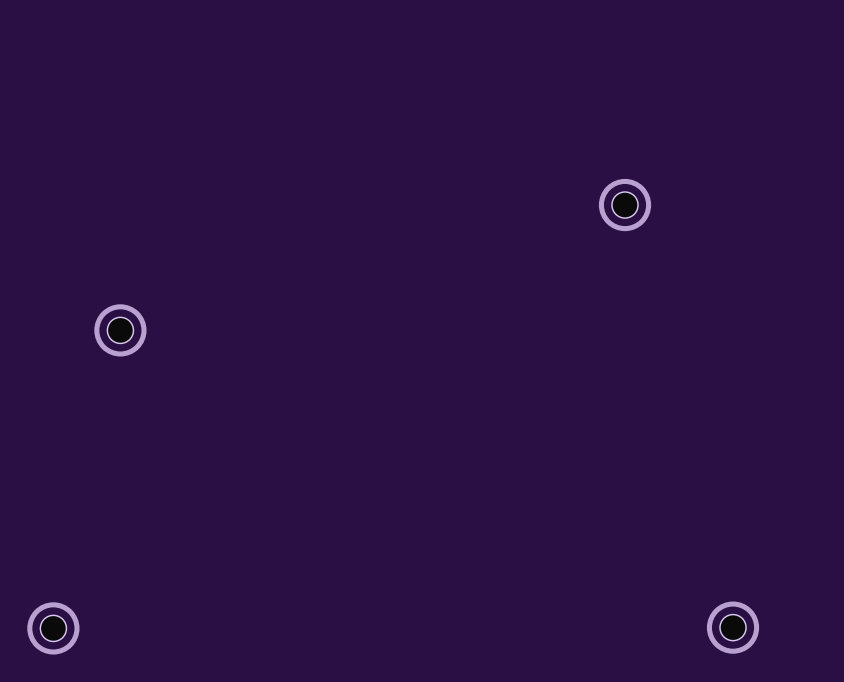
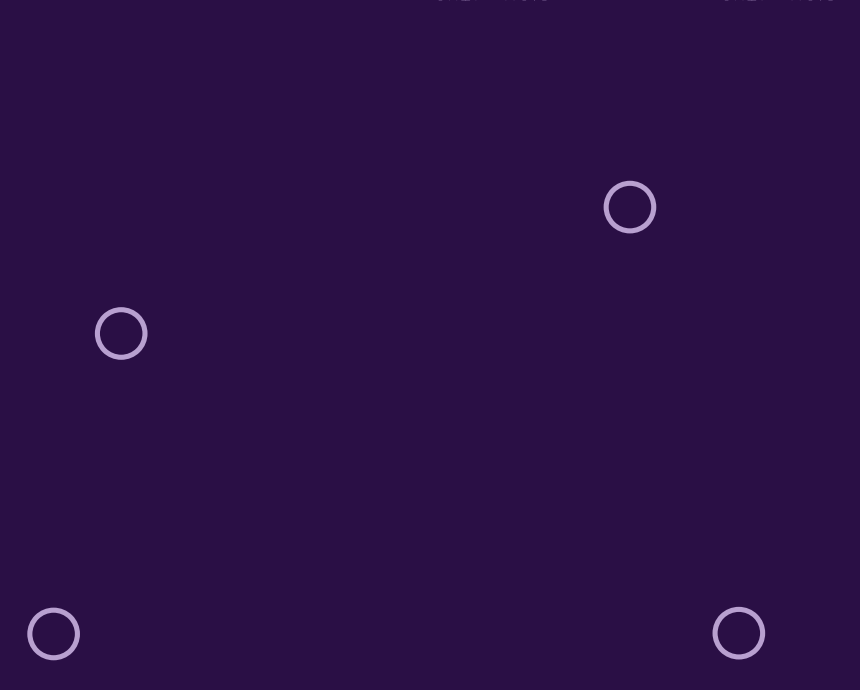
hole: (625, 205) -> none
hole: (120, 330) -> none
hole: (733, 627) -> none
hole: (53, 628) -> none

